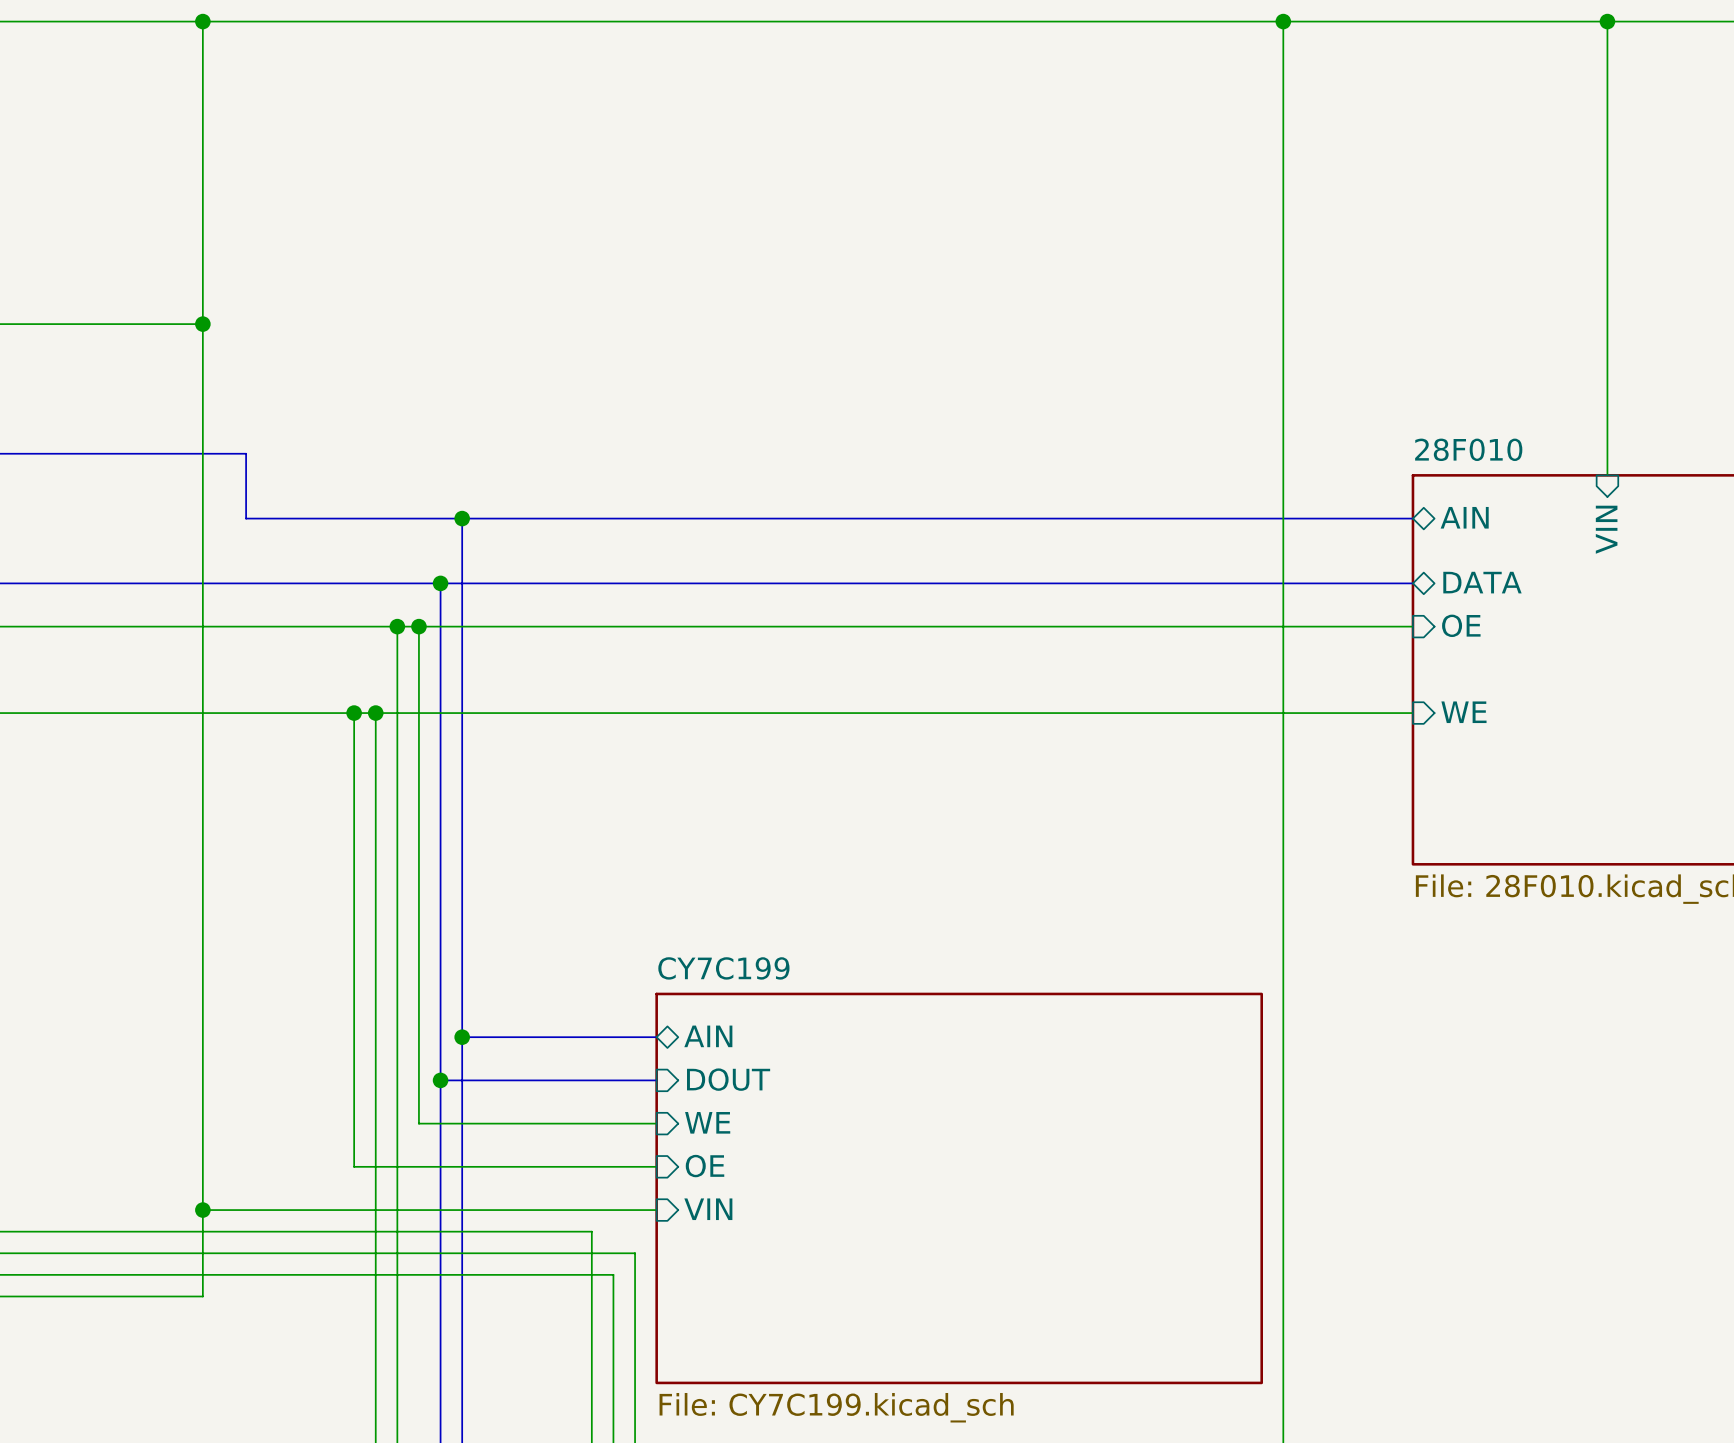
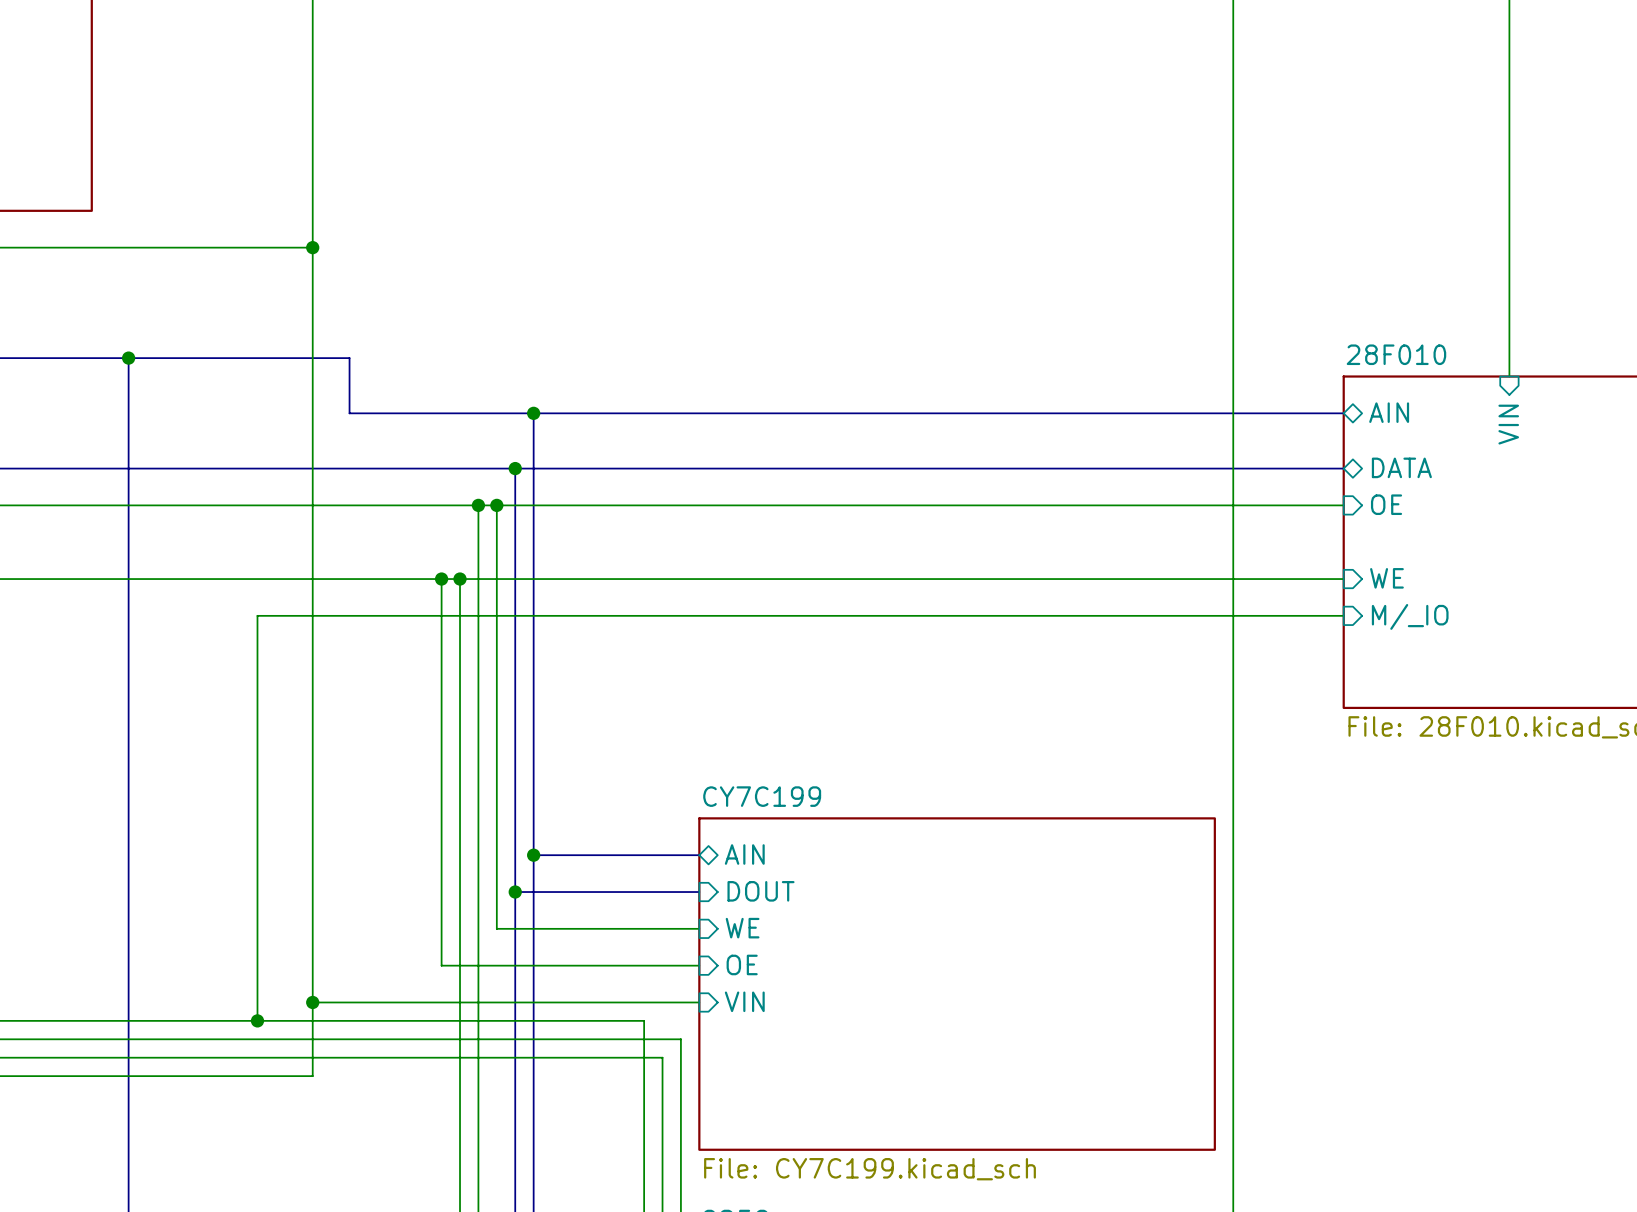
wire: none -> (1343, 615) (257, 615) (257, 1020)
sheet pin: none -> M/_IO (1410, 616)
junction: none -> (257, 1020)

